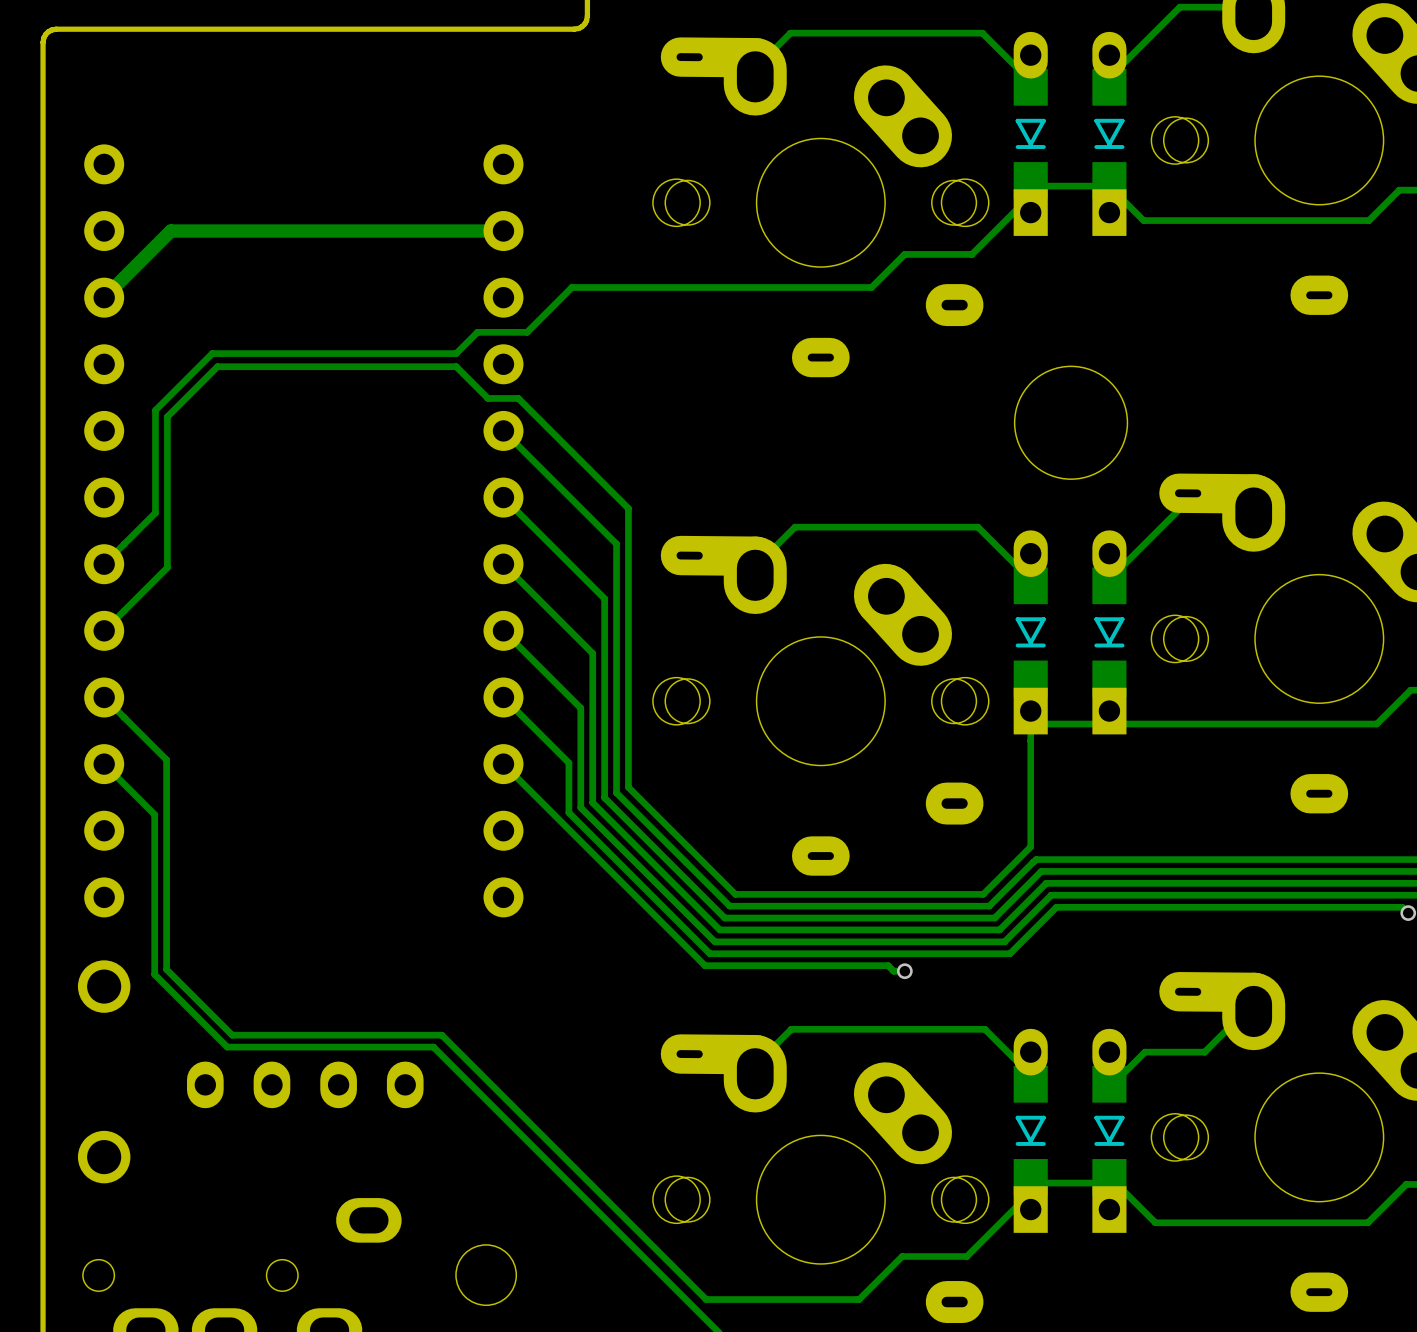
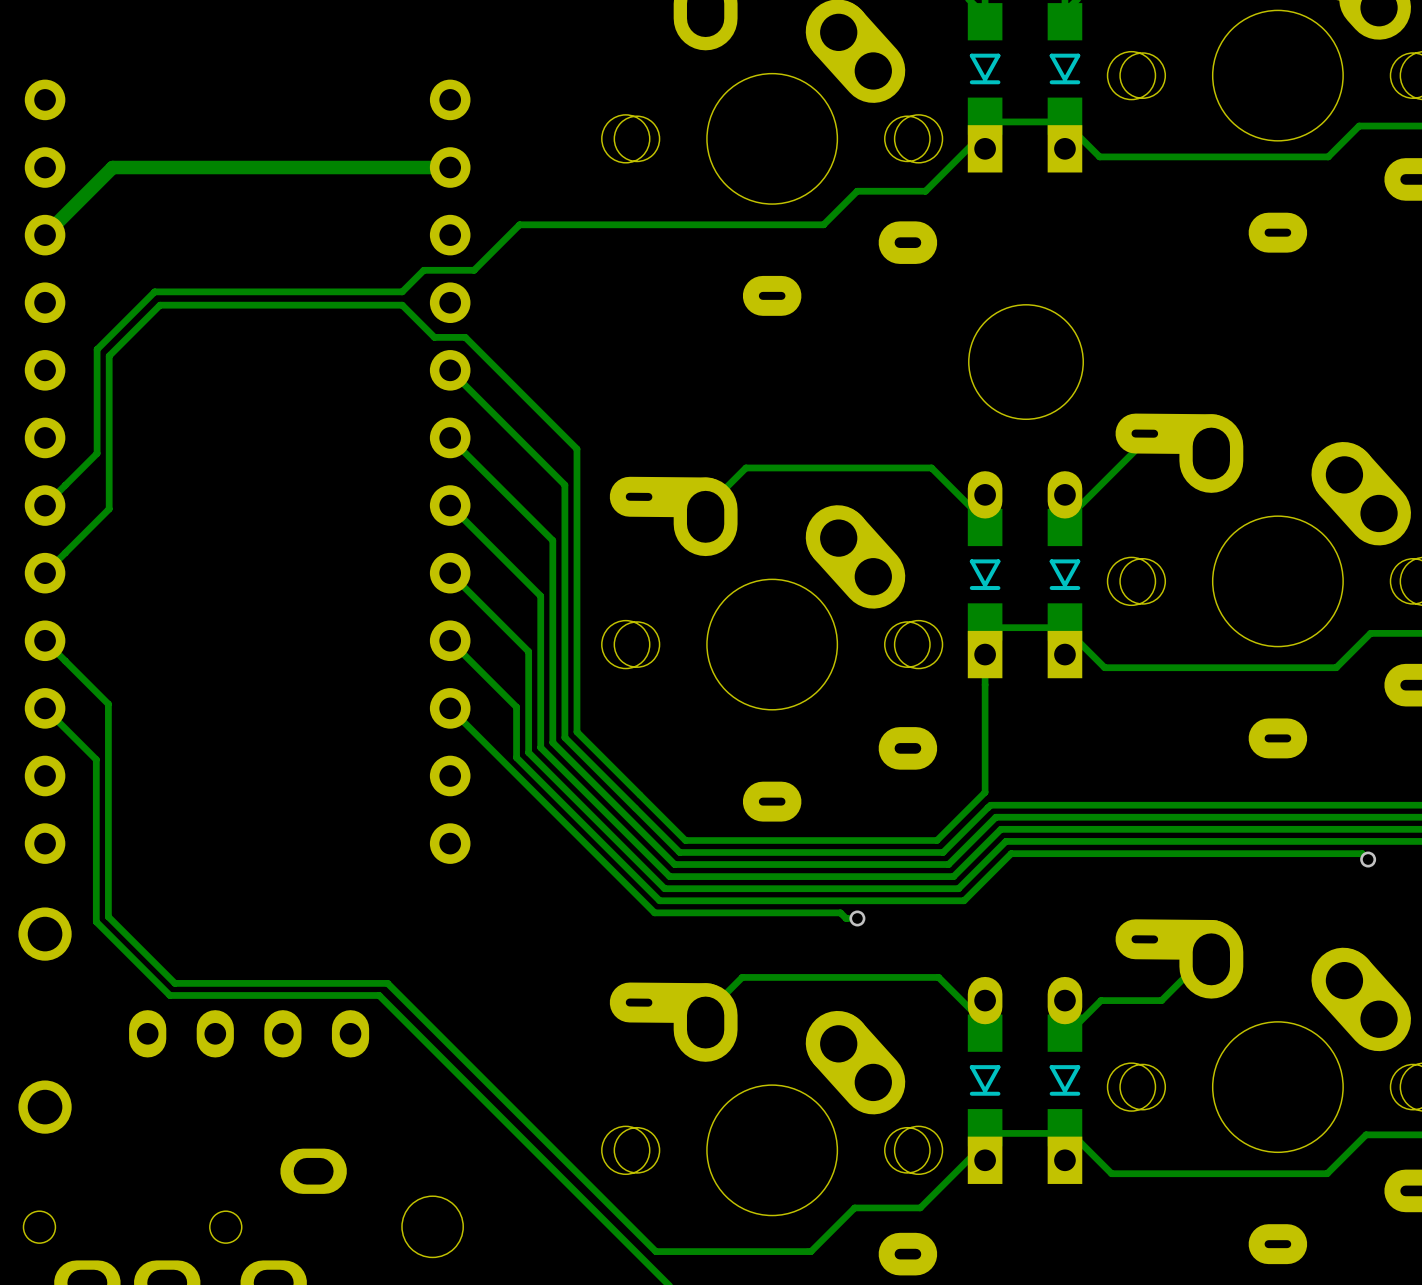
track: (1030, 711) (1043, 724) (1148, 724) -> (985, 654) (985, 627) (1064, 627) (1104, 667)

